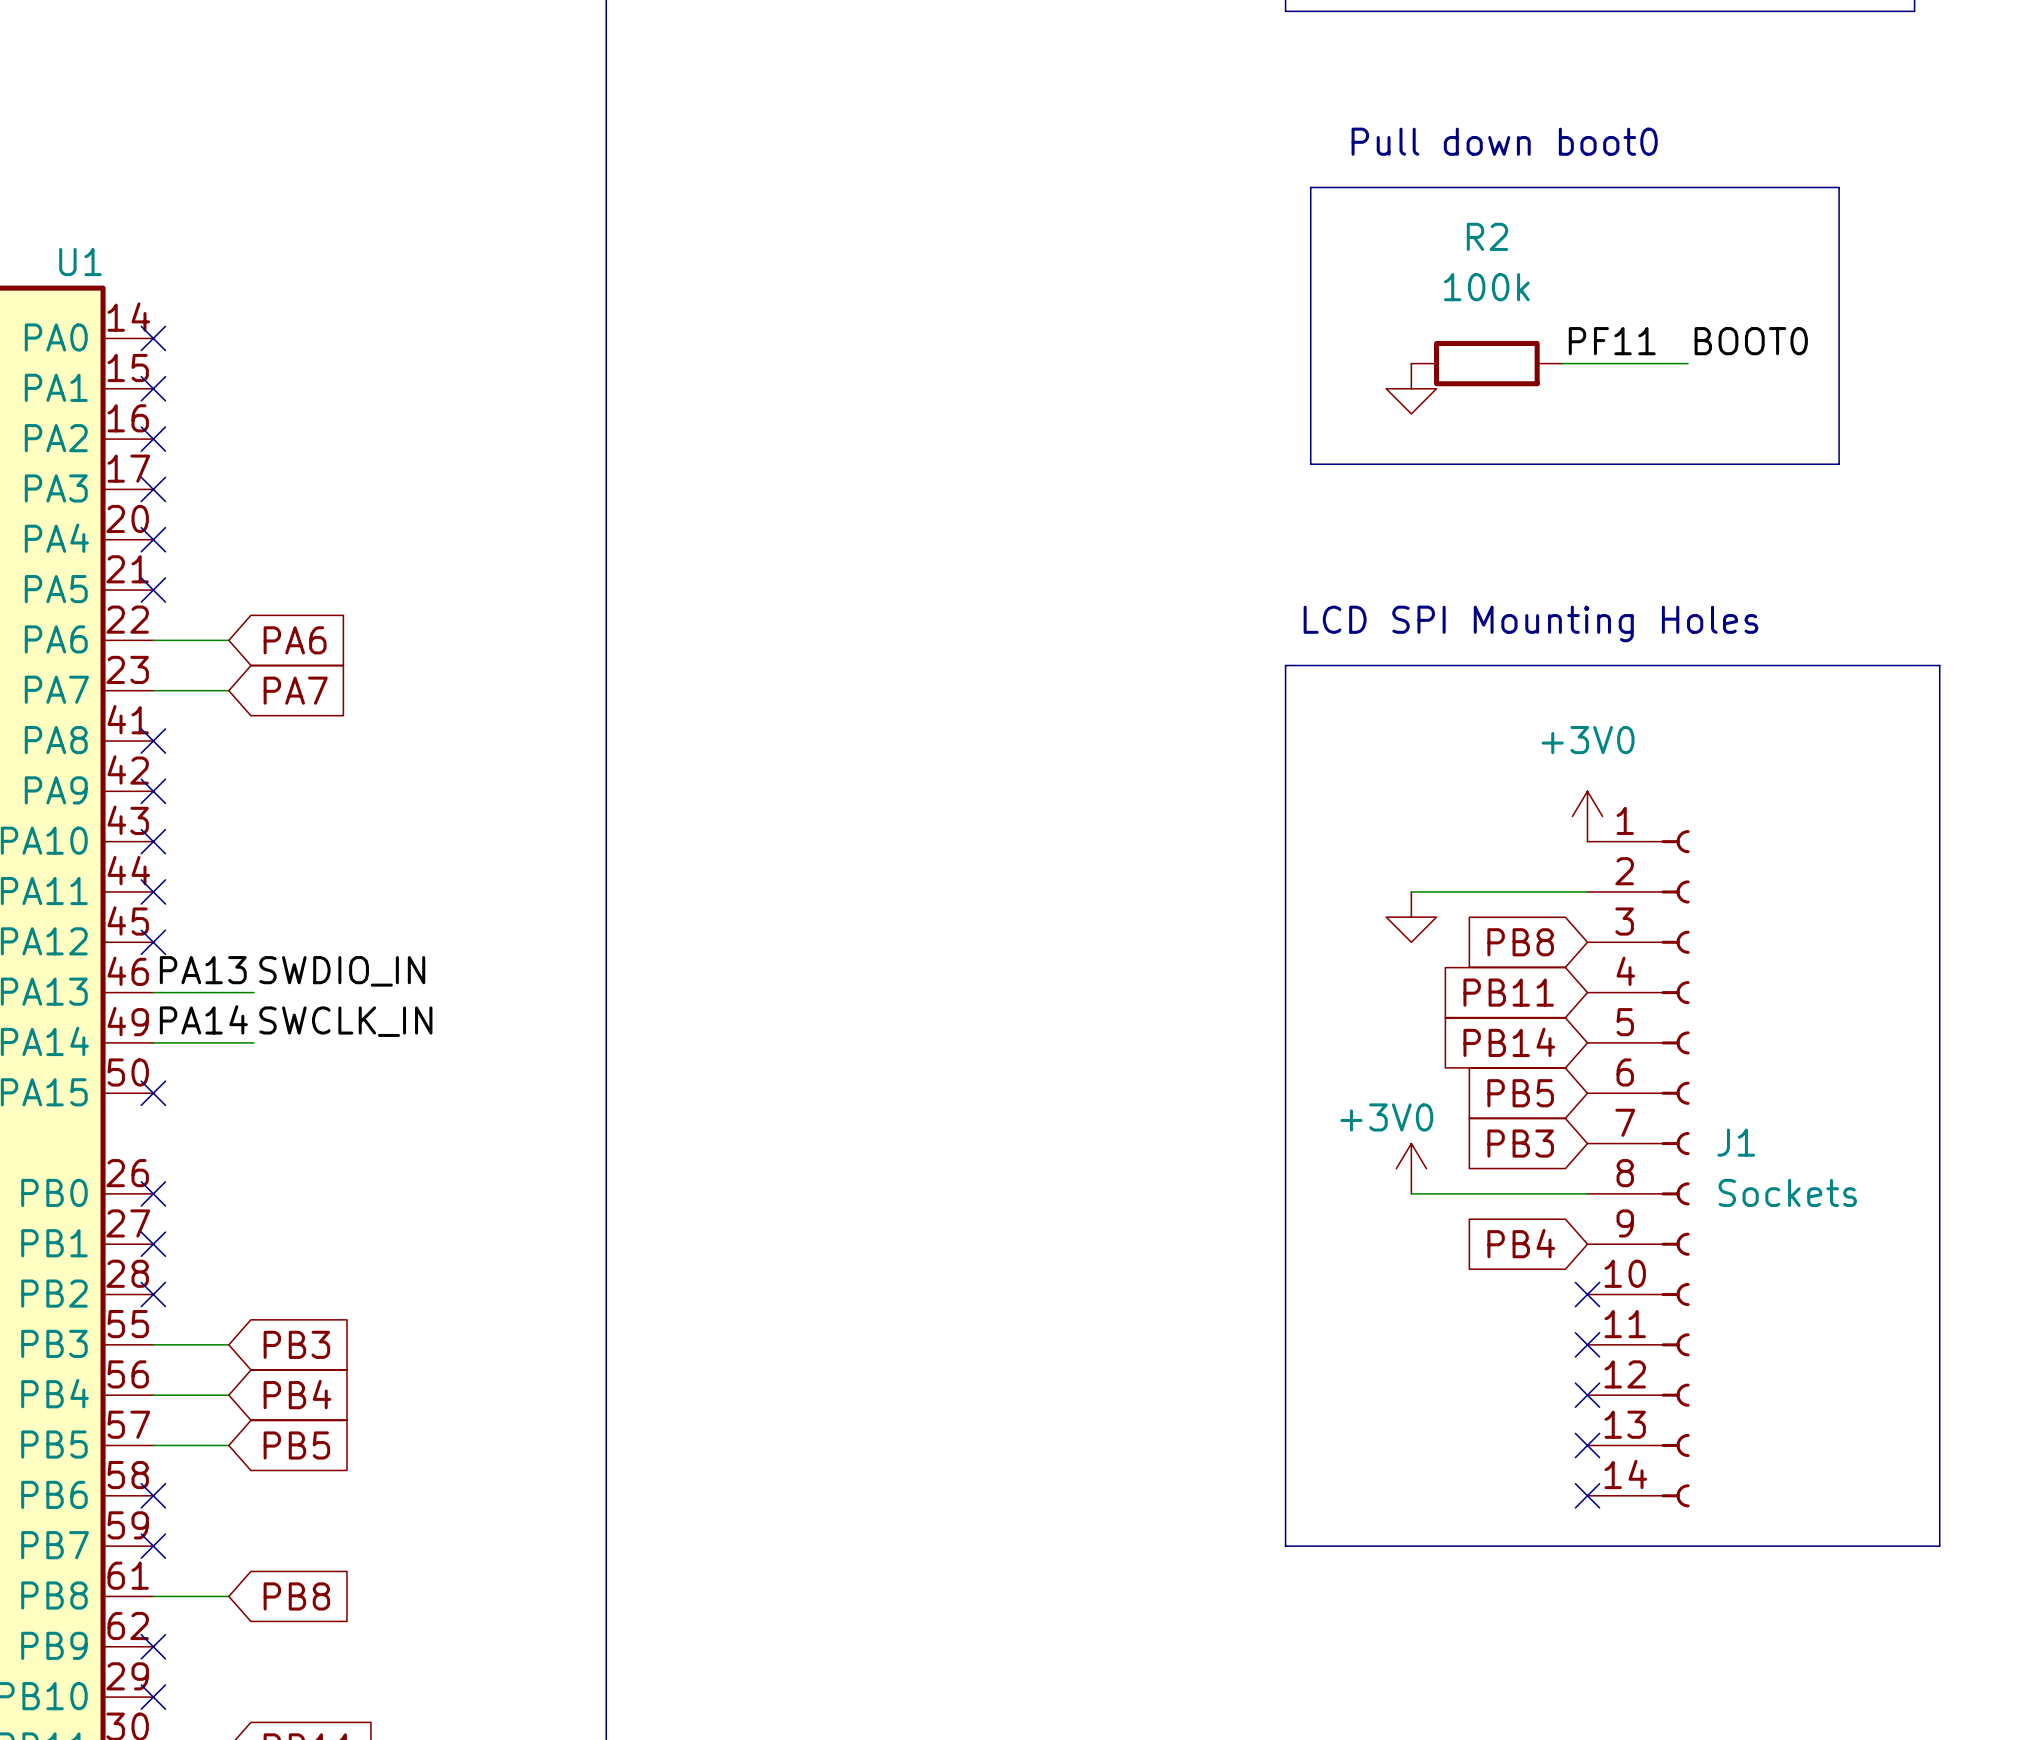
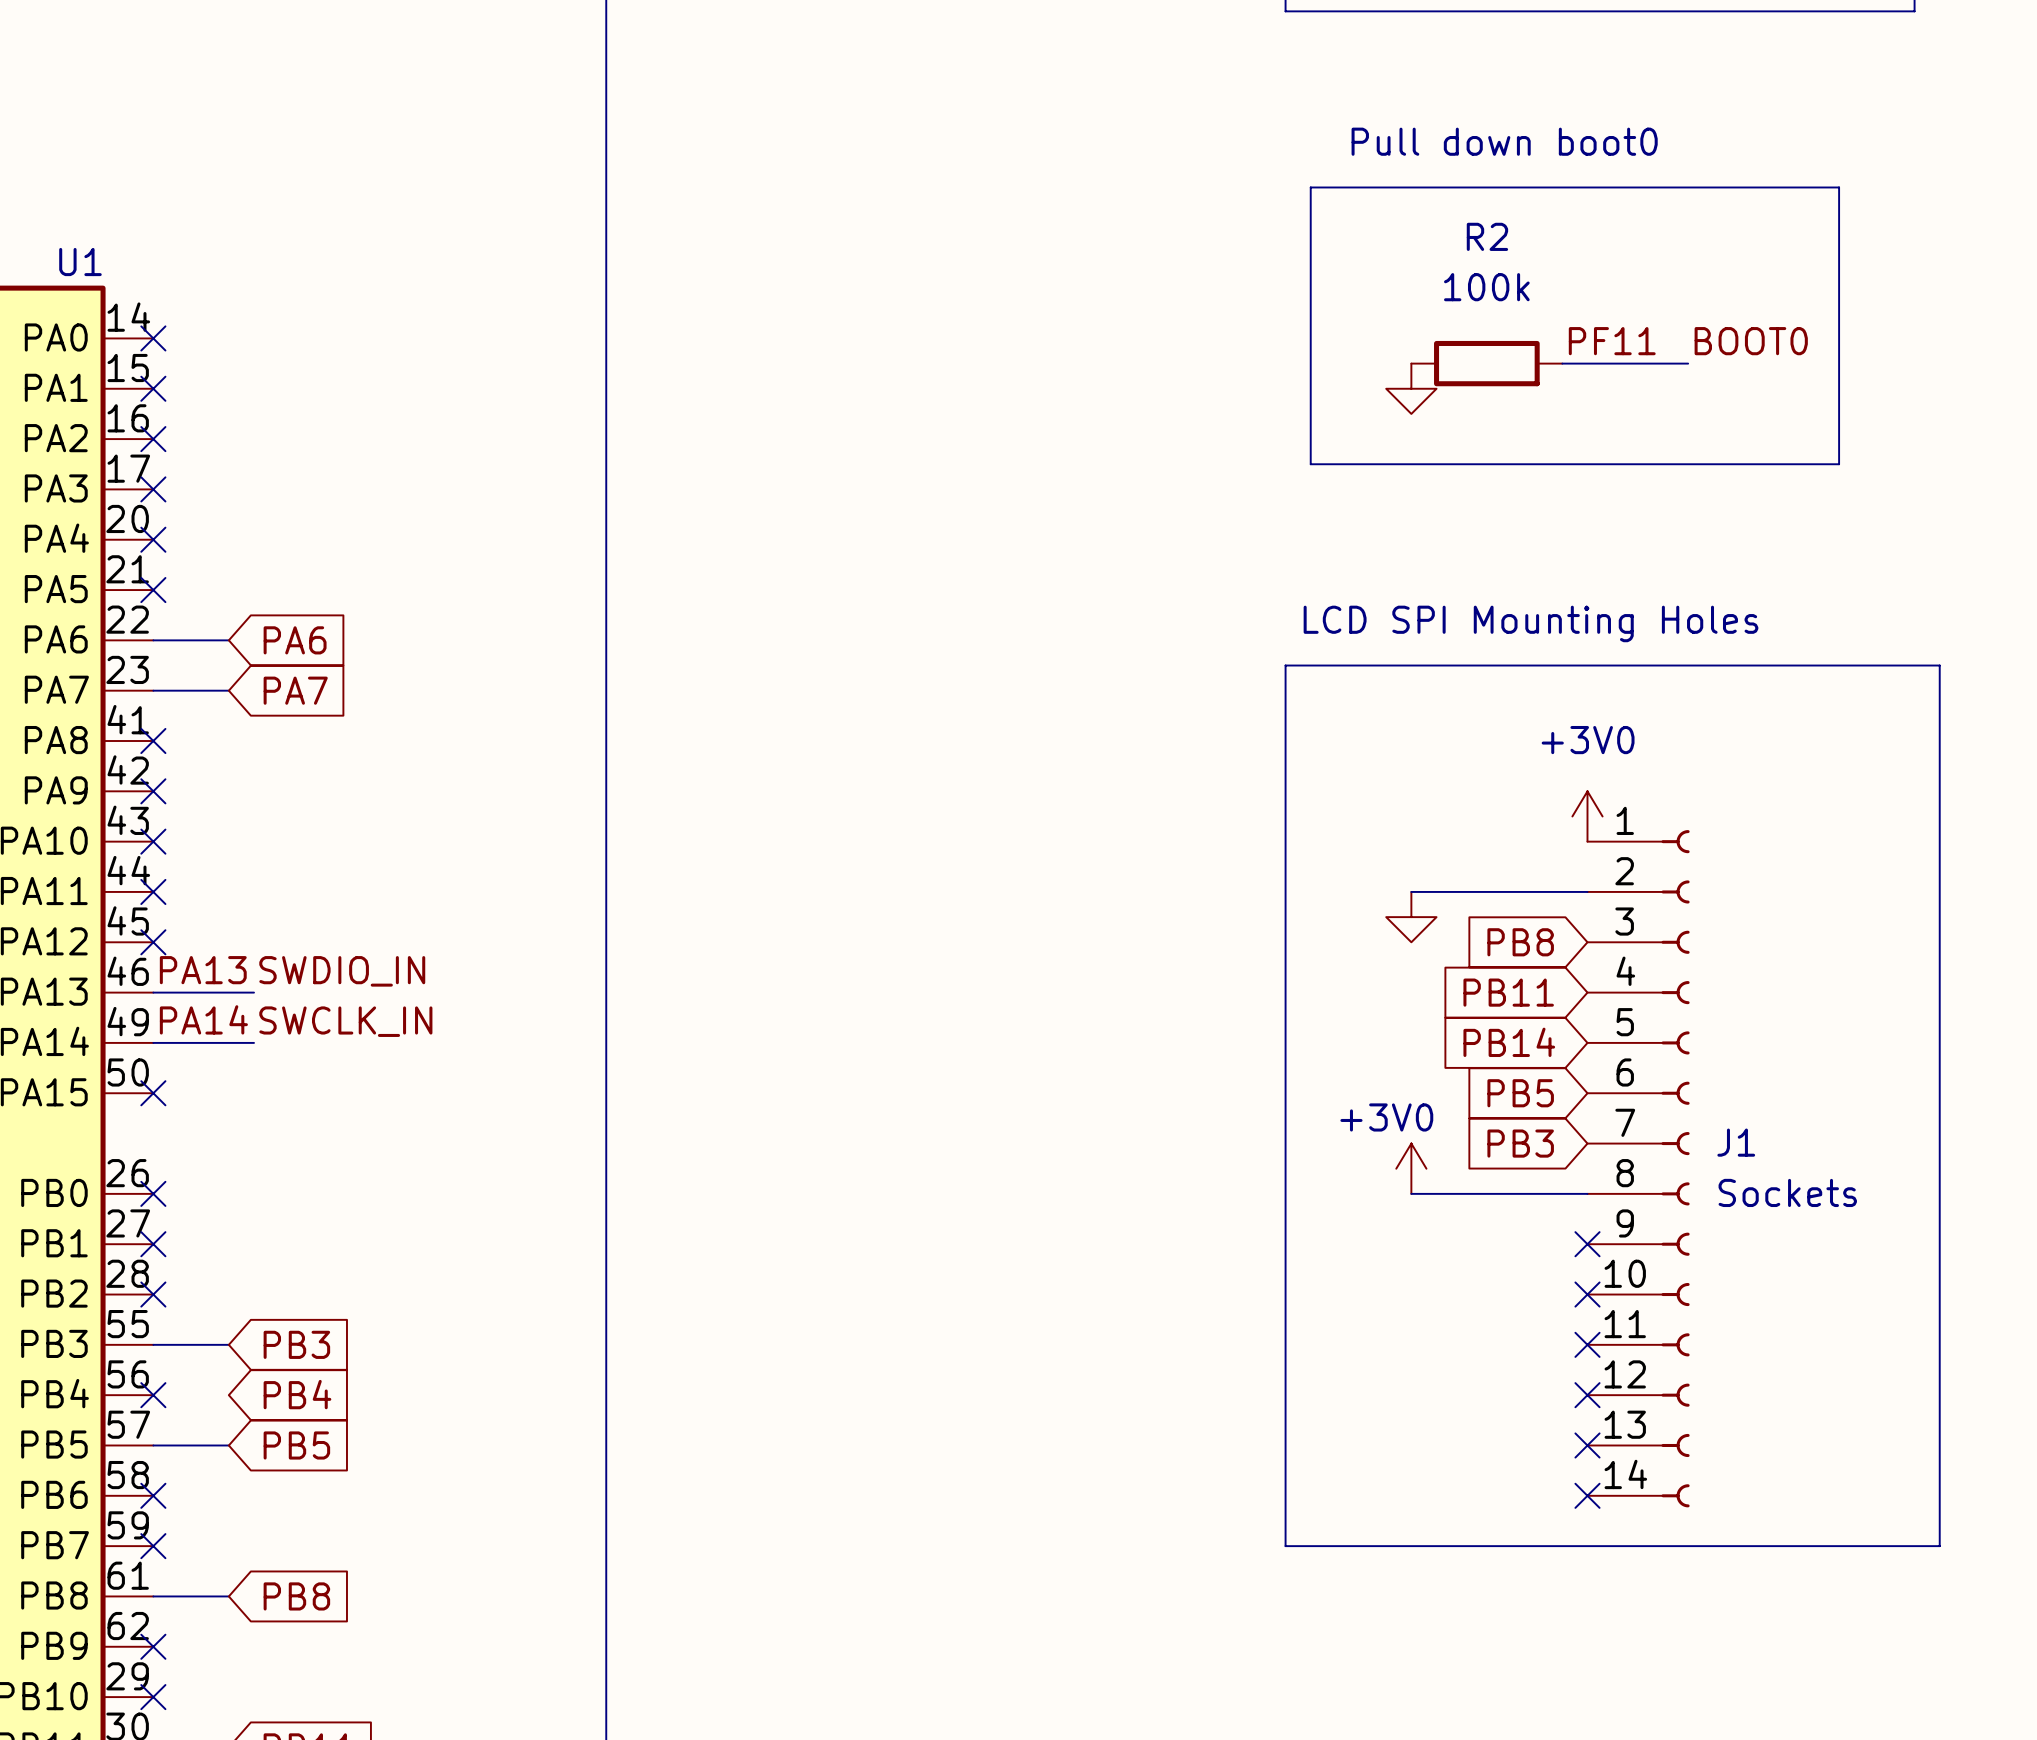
global label: PB4 (1521, 1243) -> none
no-connect mark: none -> (1587, 1244)
wire: (153, 1395) (228, 1395) -> none
no-connect mark: none -> (153, 1395)

